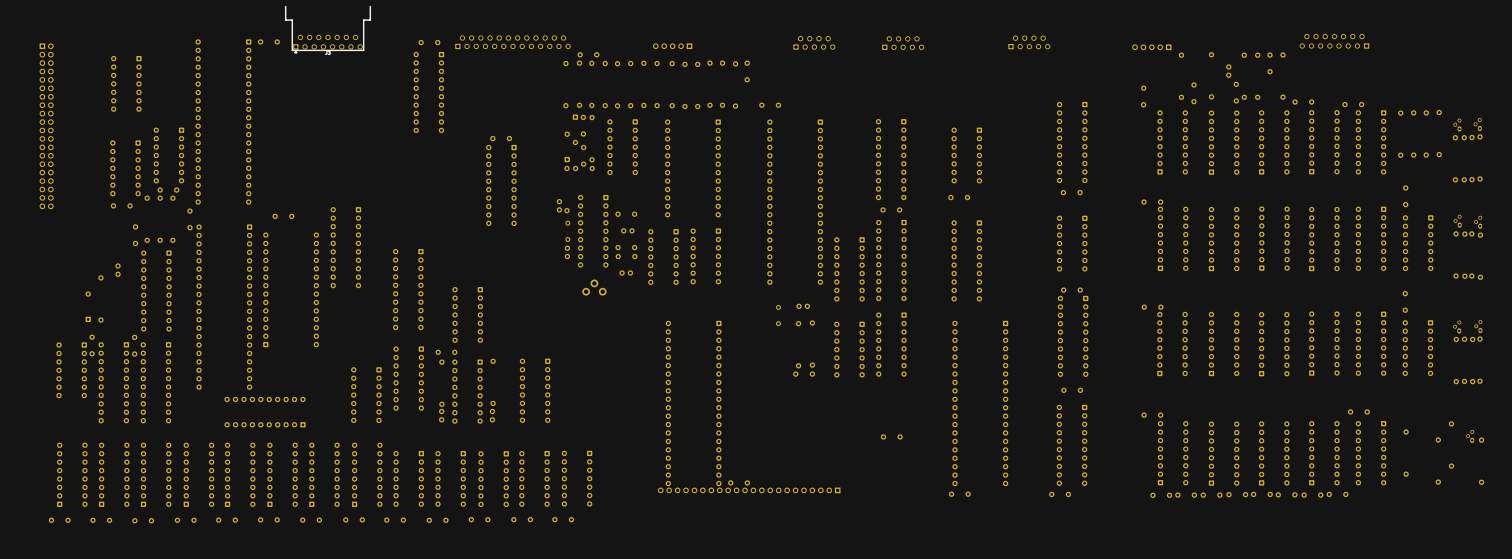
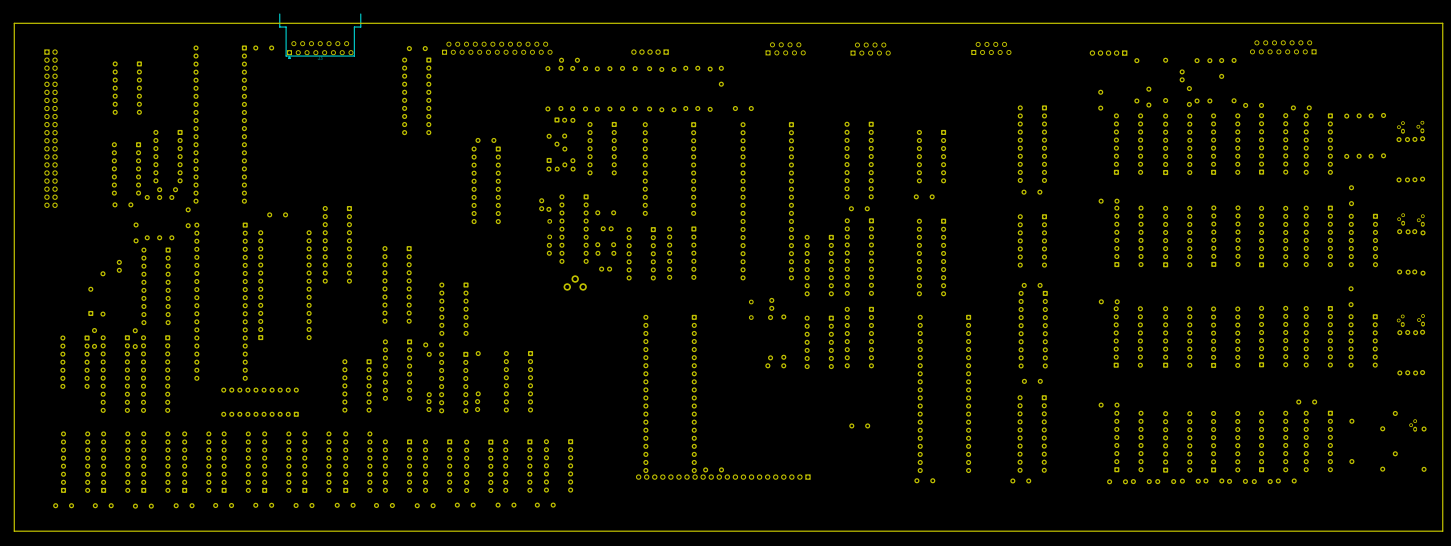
board edge: none -> (1442, 23) (14, 23) (14, 531) (1442, 531) (1442, 23)
part rotation: 0° (803, 306) -> 90° clockwise (771, 304)

